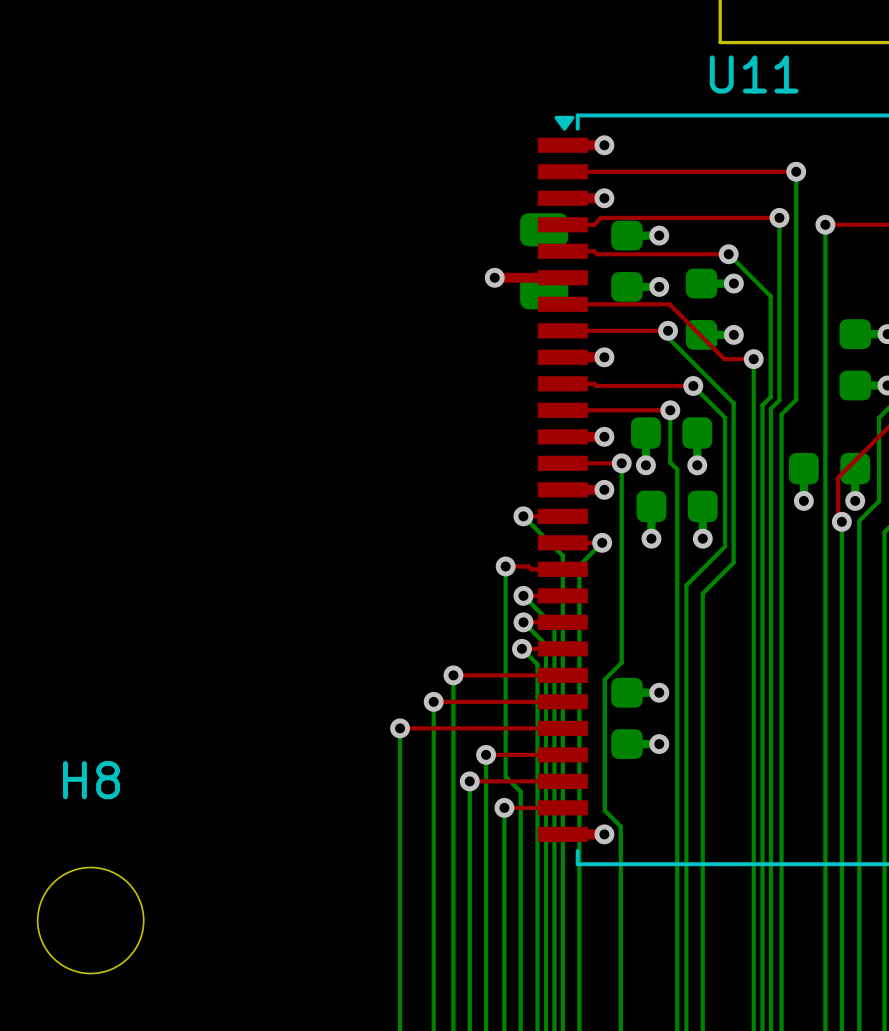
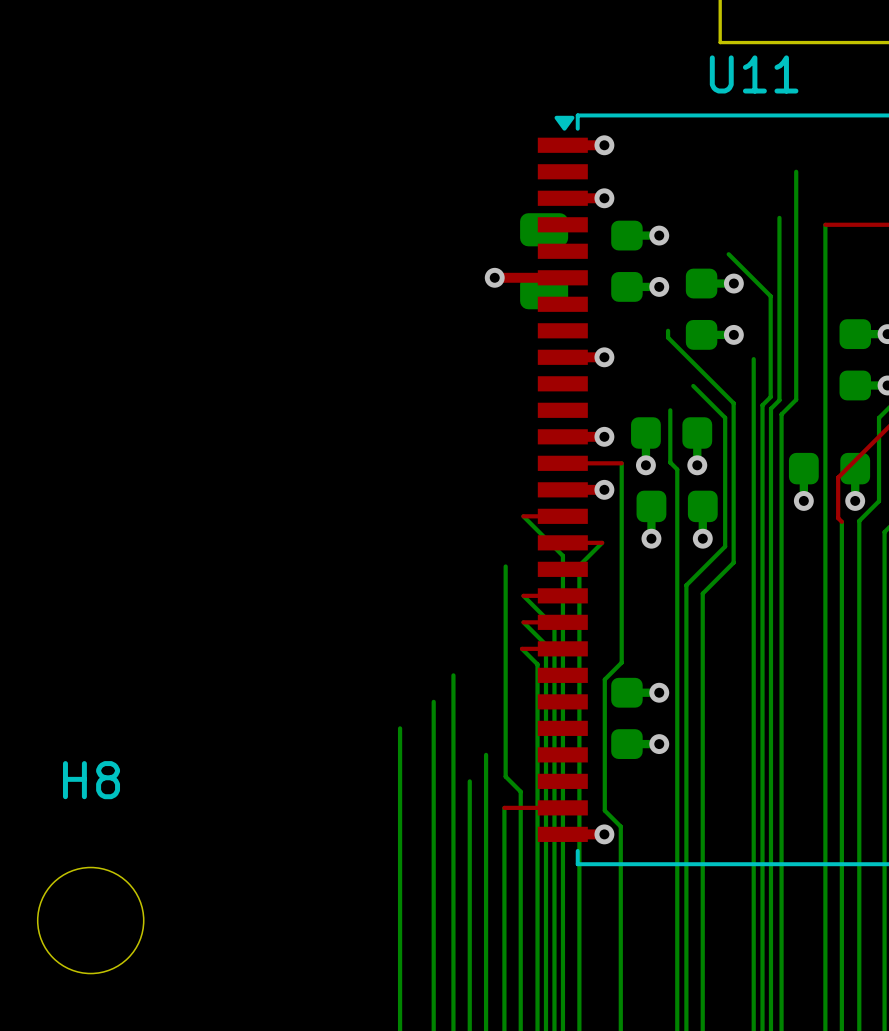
top track: (562, 171) (796, 171) -> none
via: (796, 171) -> none
top track: (779, 217) (601, 217) (594, 224) (562, 224) -> none
via: (779, 217) -> none
via: (825, 224) -> none
top track: (562, 251) (594, 251) (597, 254) (728, 254) -> none
via: (728, 254) -> none
top track: (562, 304) (669, 304) (724, 359) (753, 359) -> none
top track: (562, 330) (668, 330) -> none
via: (668, 330) -> none
via: (753, 359) -> none
top track: (562, 383) (594, 383) (596, 385) (693, 385) -> none
via: (693, 385) -> none
top track: (562, 410) (670, 410) -> none
via: (670, 410) -> none
via: (621, 463) -> none
via: (523, 516) -> none
via: (841, 521) -> none
via: (602, 542) -> none
top track: (505, 566) (528, 566) (531, 569) (562, 569) -> none
via: (505, 566) -> none
via: (523, 595) -> none
via: (523, 622) -> none
via: (521, 648) -> none
top track: (453, 675) (562, 675) -> none
via: (453, 675) -> none
top track: (433, 701) (562, 701) -> none
via: (433, 701) -> none
top track: (400, 728) (562, 728) -> none
via: (400, 728) -> none
top track: (486, 754) (562, 754) -> none
via: (486, 754) -> none
top track: (469, 781) (562, 781) -> none
via: (469, 781) -> none
via: (504, 807) -> none

